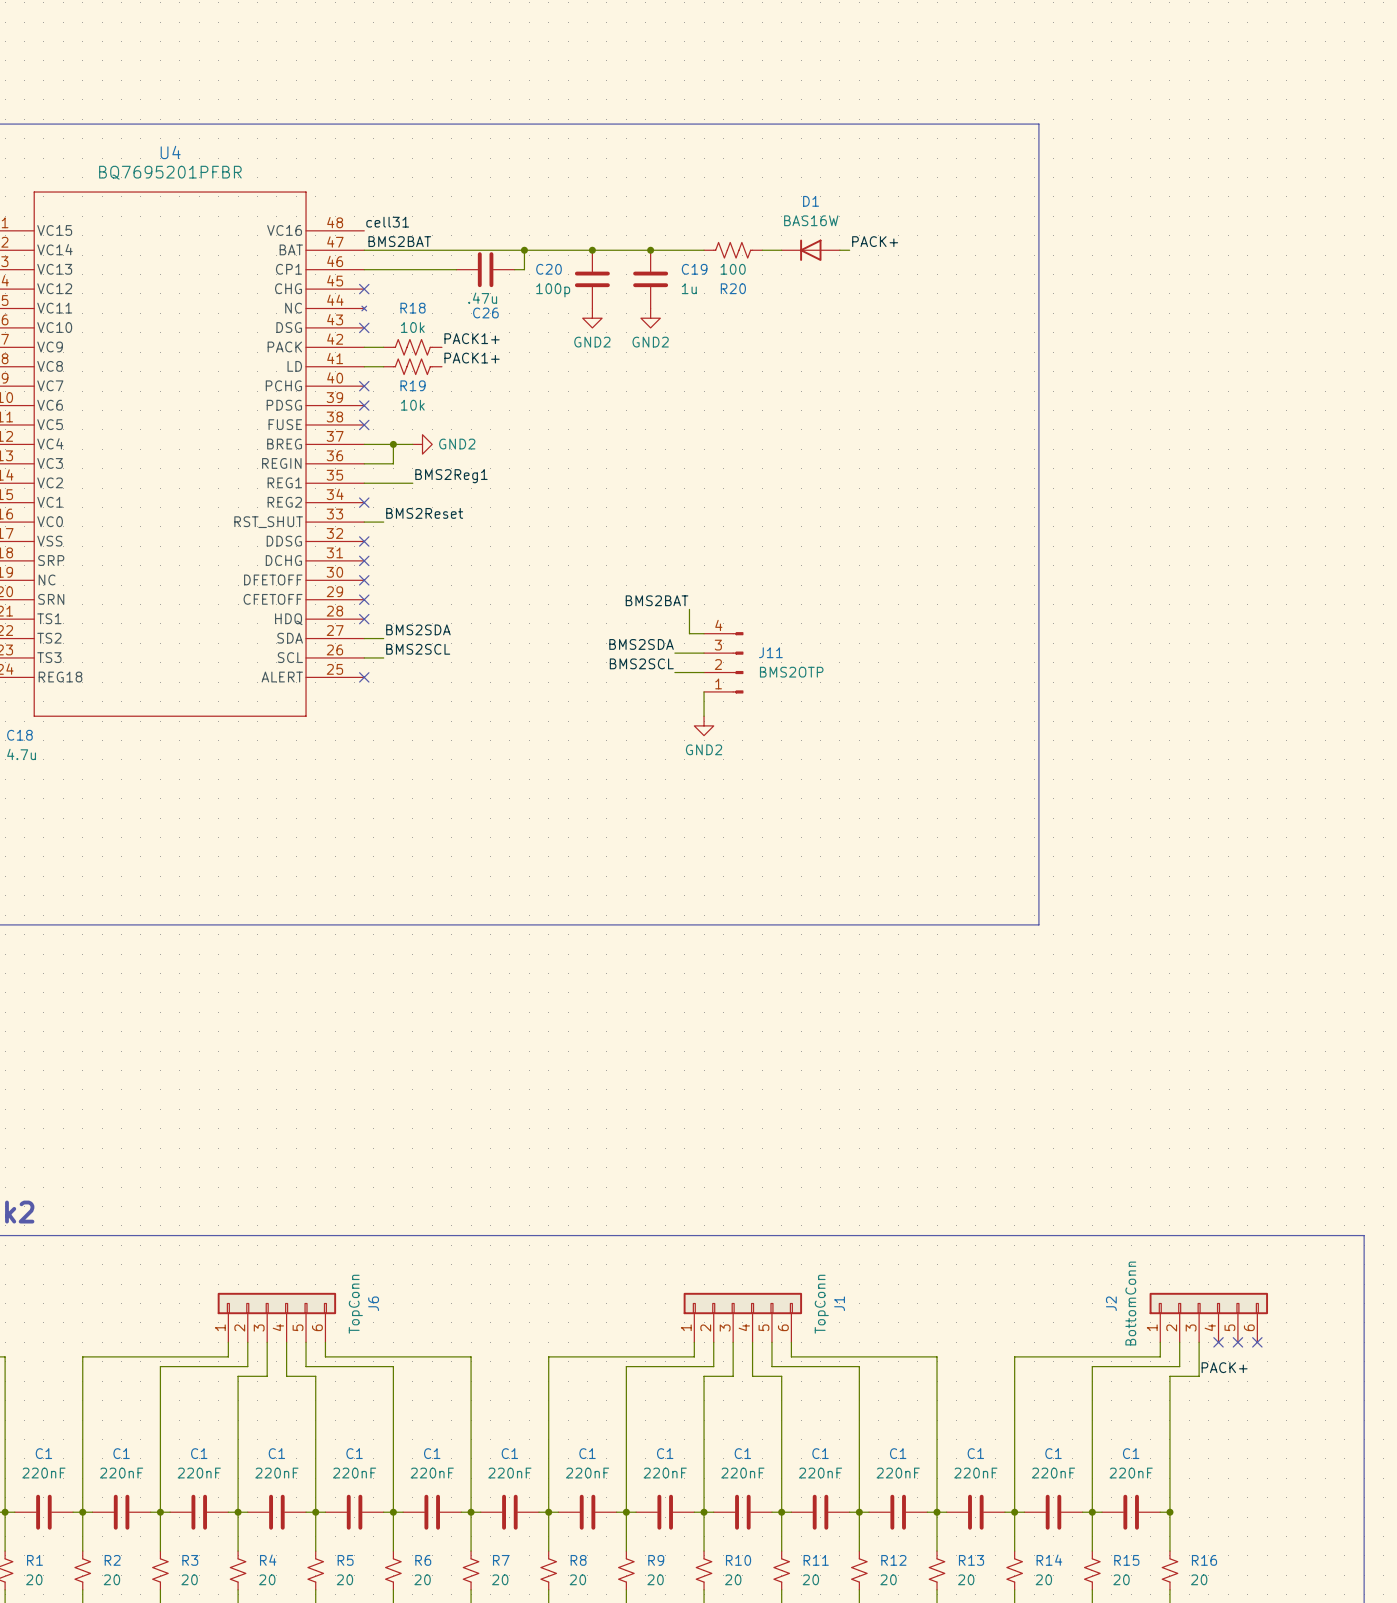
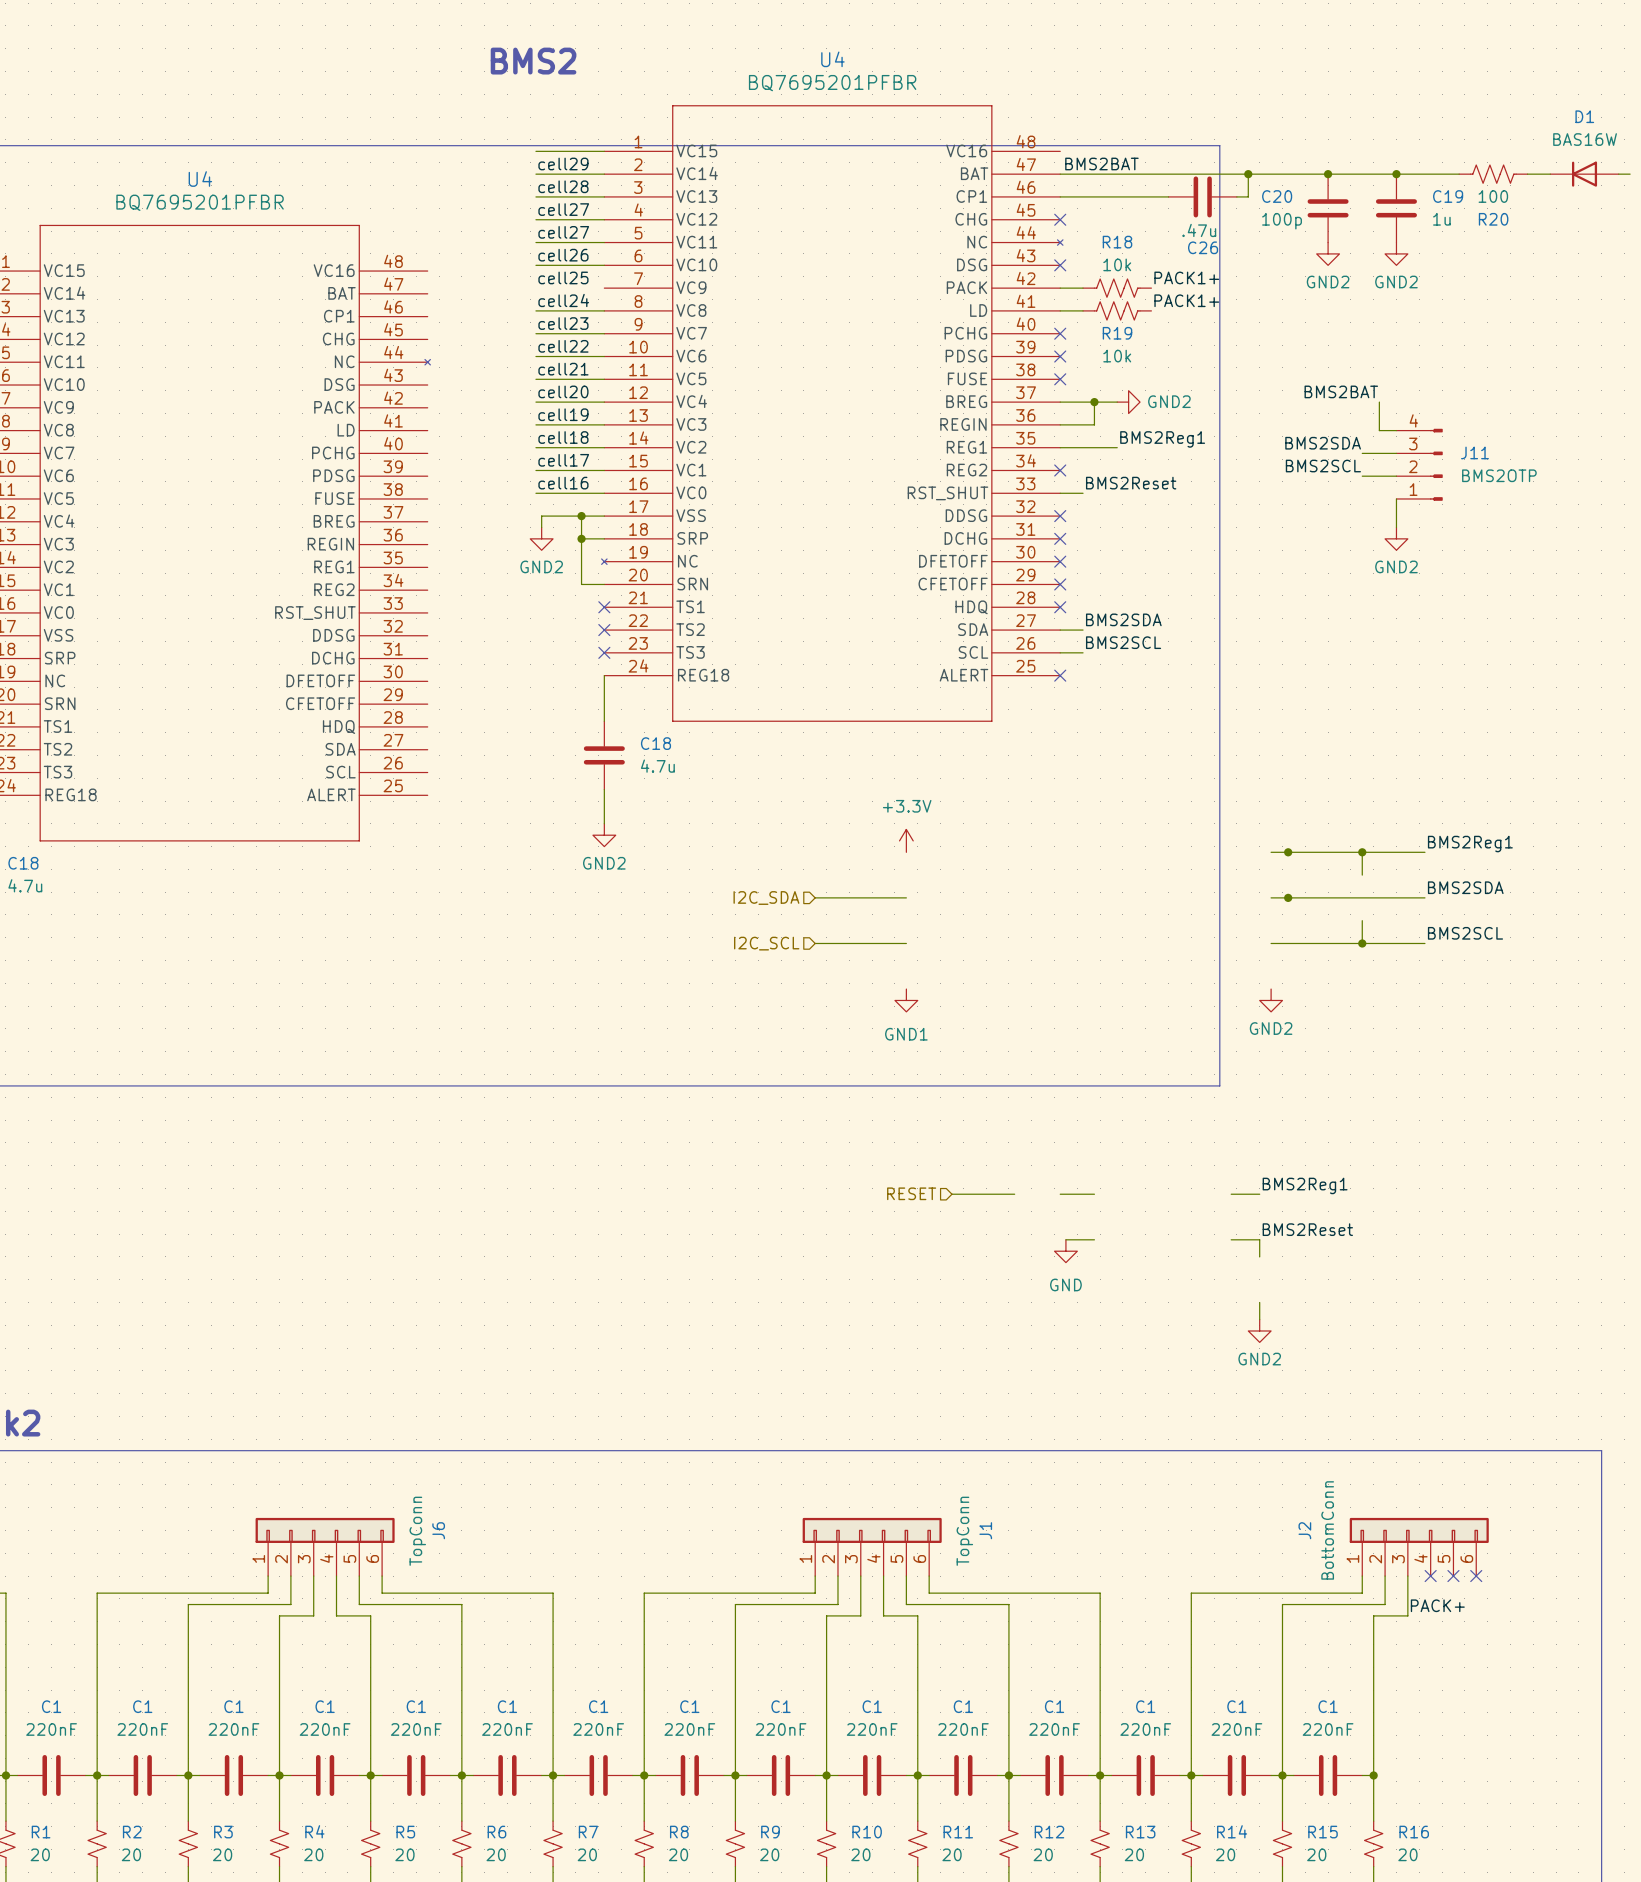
text: none -> BMS2 (533, 61)
wire: none -> (535, 151) (604, 151)
label: none -> cell29 (563, 163)
label: none -> BMS2BAT (1101, 163)
wire: none -> (535, 174) (604, 174)
wire: none -> (1060, 174) (1459, 174)
wire: none -> (1248, 174) (1248, 196) (1236, 196)
junction: none -> (1248, 174)
junction: none -> (1328, 174)
junction: none -> (1396, 174)
R20: none -> 100 (1493, 174)
wire: none -> (1527, 174) (1550, 174)
D1: none -> BAS16W (1584, 174)
wire: none -> (1618, 174) (1630, 174)
label: none -> cell28 (563, 186)
wire: none -> (535, 196) (604, 196)
wire: none -> (1060, 196) (1168, 196)
C26: none -> .47u (1202, 196)
C20: none -> 100p (1328, 208)
C19: none -> 1u (1396, 208)
label: none -> cell27 (563, 209)
wire: none -> (535, 219) (604, 219)
no-connect mark: none -> (1060, 219)
label: none -> cell27 (563, 232)
wire: none -> (535, 242) (604, 242)
power symbol: none -> GND2 (1328, 253)
power symbol: none -> GND2 (1396, 253)
label: none -> cell26 (563, 255)
label: cell31 (387, 222) -> none
wire: none -> (535, 265) (604, 265)
no-connect mark: none -> (1060, 265)
label: none -> cell25 (563, 277)
label: none -> PACK1+ (1186, 277)
label: BMS2BAT (399, 241) -> none
label: PACK+ (875, 241) -> none
R18: none -> 10k (1117, 288)
wire: (364, 250) (704, 250) -> none
wire: (524, 250) (524, 269) (514, 269) -> none
junction: (524, 250) -> none
junction: (592, 250) -> none
junction: (650, 250) -> none
R20: 100 (733, 250) -> none
wire: (762, 250) (781, 250) -> (1060, 288) (1083, 288)
D1: BAS16W (810, 250) -> none
wire: (839, 250) (849, 250) -> none
label: none -> cell24 (563, 300)
label: none -> PACK1+ (1186, 300)
wire: none -> (535, 310) (604, 310)
wire: none -> (1060, 310) (1083, 310)
R19: none -> 10k (1117, 310)
wire: (364, 269) (456, 269) -> none
C26: .47u (485, 269) -> none
label: none -> cell23 (563, 323)
C20: 100p (592, 279) -> none
C19: 1u (650, 279) -> none
wire: none -> (535, 333) (604, 333)
no-connect mark: none -> (1060, 333)
no-connect mark: (364, 289) -> none
label: none -> cell22 (563, 346)
wire: none -> (535, 356) (604, 356)
no-connect mark: none -> (1060, 356)
label: none -> cell21 (563, 369)
power symbol: GND2 (592, 318) -> none
power symbol: GND2 (650, 318) -> none
wire: none -> (535, 379) (604, 379)
no-connect mark: none -> (1060, 379)
no-connect mark: (364, 327) -> none
label: none -> cell20 (563, 391)
label: none -> BMS2BAT (1341, 391)
label: PACK1+ (472, 338) -> none
wire: none -> (535, 402) (604, 402)
wire: none -> (1060, 402) (1117, 402)
wire: none -> (1094, 402) (1094, 424) (1060, 424)
junction: none -> (1094, 402)
power symbol: none -> GND2 (1128, 402)
wire: none -> (1379, 402) (1379, 430) (1396, 430)
wire: (364, 347) (383, 347) -> none
R18: 10k (412, 347) -> none
U4: none -> BQ7695201PFBR (832, 413)
label: none -> cell19 (563, 414)
label: PACK1+ (472, 358) -> none
wire: none -> (535, 424) (604, 424)
wire: (364, 366) (383, 366) -> none
R19: 10k (412, 366) -> none
label: none -> cell18 (563, 437)
label: none -> BMS2Reg1 (1162, 439)
label: none -> BMS2SDA (1323, 443)
wire: none -> (535, 447) (604, 447)
wire: none -> (1060, 447) (1117, 447)
no-connect mark: (364, 386) -> none
wire: none -> (1362, 453) (1396, 453)
label: none -> cell17 (563, 460)
label: none -> BMS2SCL (1323, 466)
wire: none -> (535, 470) (604, 470)
no-connect mark: none -> (1060, 470)
no-connect mark: (364, 405) -> none
wire: none -> (1362, 476) (1396, 476)
label: none -> cell16 (563, 483)
label: none -> BMS2Reset (1131, 483)
wire: none -> (535, 493) (604, 493)
wire: none -> (1060, 493) (1083, 493)
no-connect mark: (364, 424) -> none
wire: none -> (1396, 498) (1396, 527)
wire: none -> (581, 516) (581, 584) (604, 584)
junction: none -> (581, 516)
wire: none -> (604, 516) (541, 516) (541, 527)
no-connect mark: none -> (1060, 516)
wire: (364, 444) (412, 444) -> none
wire: (393, 444) (393, 463) (364, 463) -> none
junction: (393, 444) -> none
power symbol rotation: 0° (422, 444) -> 90° clockwise (541, 538)
power symbol position: GND2 (422, 444) -> GND2 (541, 538)
junction: none -> (581, 538)
no-connect mark: none -> (1060, 538)
power symbol: none -> GND2 (1396, 538)
label: BMS2Reg1 (451, 476) -> none
no-connect mark: none -> (1060, 561)
wire: (364, 483) (412, 483) -> none
no-connect mark: none -> (1060, 584)
no-connect mark: (364, 502) -> none
label: BMS2Reset (424, 513) -> none
no-connect mark: none -> (604, 607)
no-connect mark: none -> (1060, 607)
wire: (364, 522) (383, 522) -> (581, 538) (604, 538)
label: none -> BMS2SDA (1123, 619)
no-connect mark: none -> (604, 630)
wire: none -> (1060, 630) (1083, 630)
no-connect mark: (364, 541) -> none
label: none -> BMS2SCL (1123, 642)
no-connect mark: none -> (604, 652)
wire: none -> (1060, 652) (1083, 652)
no-connect mark: (364, 560) -> none
wire: none -> (604, 675) (604, 721)
no-connect mark: none -> (1060, 675)
no-connect mark: (364, 580) -> none
no-connect mark: (364, 599) -> none
label: BMS2BAT (657, 600) -> none
wire: (689, 609) (689, 633) (704, 633) -> none
no-connect mark: (364, 619) -> none
label: BMS2SDA (418, 629) -> none
wire: (364, 638) (383, 638) -> none
C18: none -> 4.7u (604, 755)
label: BMS2SDA (641, 644) -> none
label: BMS2SCL (418, 649) -> none
wire: (674, 653) (704, 653) -> none
wire: (364, 657) (383, 657) -> none
J11 position: (723, 662) -> (1419, 464)
label: BMS2SCL (641, 663) -> none
wire: none -> (604, 789) (604, 823)
wire: (674, 672) (704, 672) -> none
no-connect mark: (364, 677) -> none
wire: (704, 691) (704, 716) -> none
power symbol: none -> GND2 (604, 835)
power symbol: none -> +3.3V (906, 840)
label: none -> BMS2Reg1 (1470, 844)
power symbol: GND2 (704, 725) -> none
wire: none -> (1271, 852) (1424, 852)
junction: none -> (1288, 852)
wire: none -> (1362, 852) (1362, 875)
junction: none -> (1362, 852)
label: none -> BMS2SDA (1465, 887)
hierarchical label: none -> I2C_SDA (766, 898)
wire: none -> (815, 897) (906, 897)
wire: none -> (1271, 897) (1424, 897)
junction: none -> (1288, 897)
wire: none -> (1362, 920) (1362, 943)
label: none -> BMS2SCL (1465, 933)
hierarchical label: none -> I2C_SCL (766, 943)
wire: none -> (815, 943) (906, 943)
wire: none -> (1271, 943) (1424, 943)
junction: none -> (1362, 943)
power symbol: none -> GND1 (906, 1000)
power symbol: none -> GND2 (1271, 1000)
label: none -> BMS2Reg1 (1305, 1185)
hierarchical label: none -> RESET (911, 1193)
wire: none -> (951, 1194) (1014, 1194)
wire: none -> (1060, 1194) (1094, 1194)
wire: none -> (1231, 1194) (1259, 1194)
label: none -> BMS2Reset (1307, 1229)
wire: none -> (1065, 1239) (1094, 1239)
wire: none -> (1231, 1239) (1259, 1239) (1259, 1256)
power symbol: none -> GND (1065, 1251)
wire: none -> (1259, 1302) (1259, 1319)
power symbol: none -> GND2 (1259, 1330)

